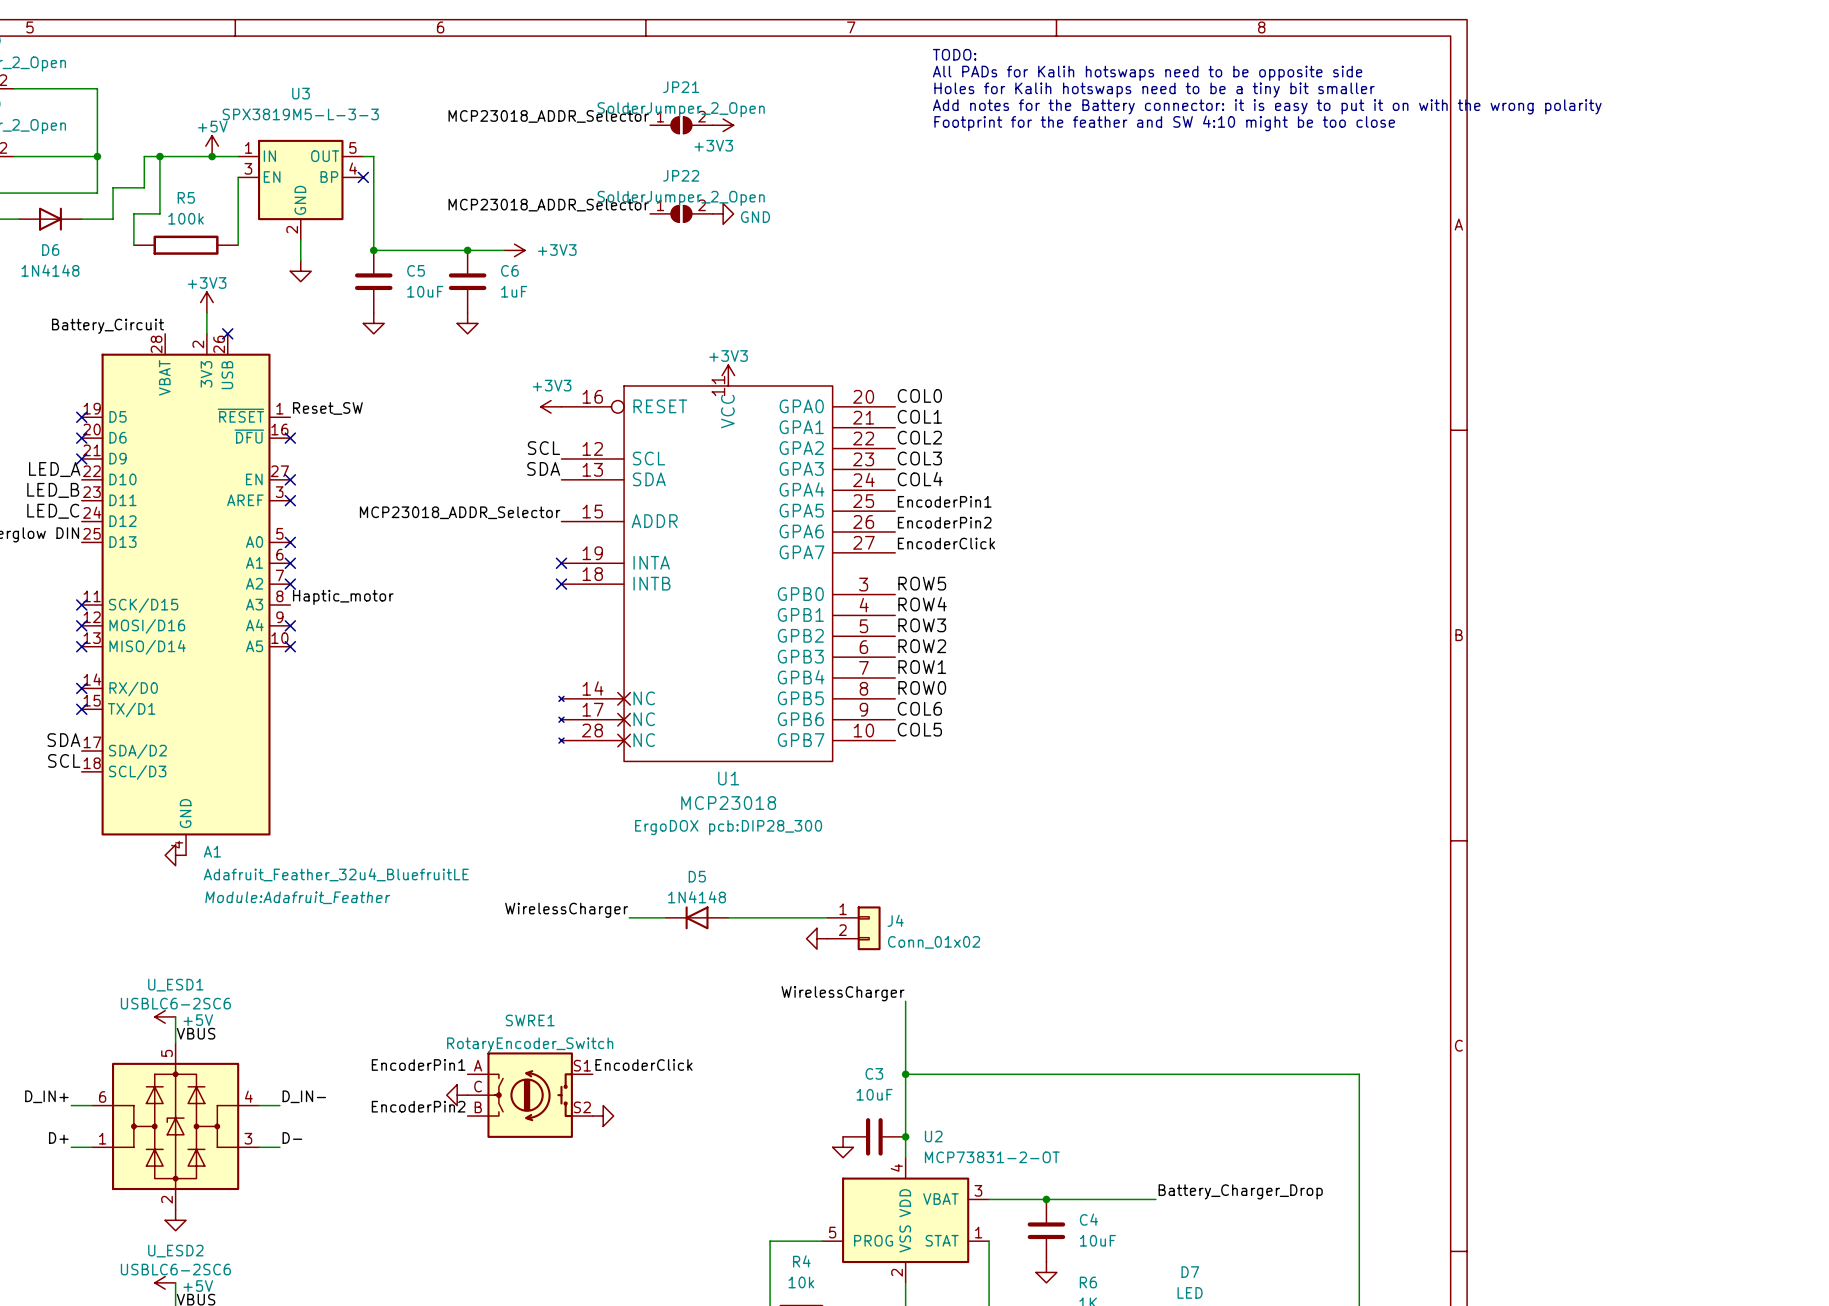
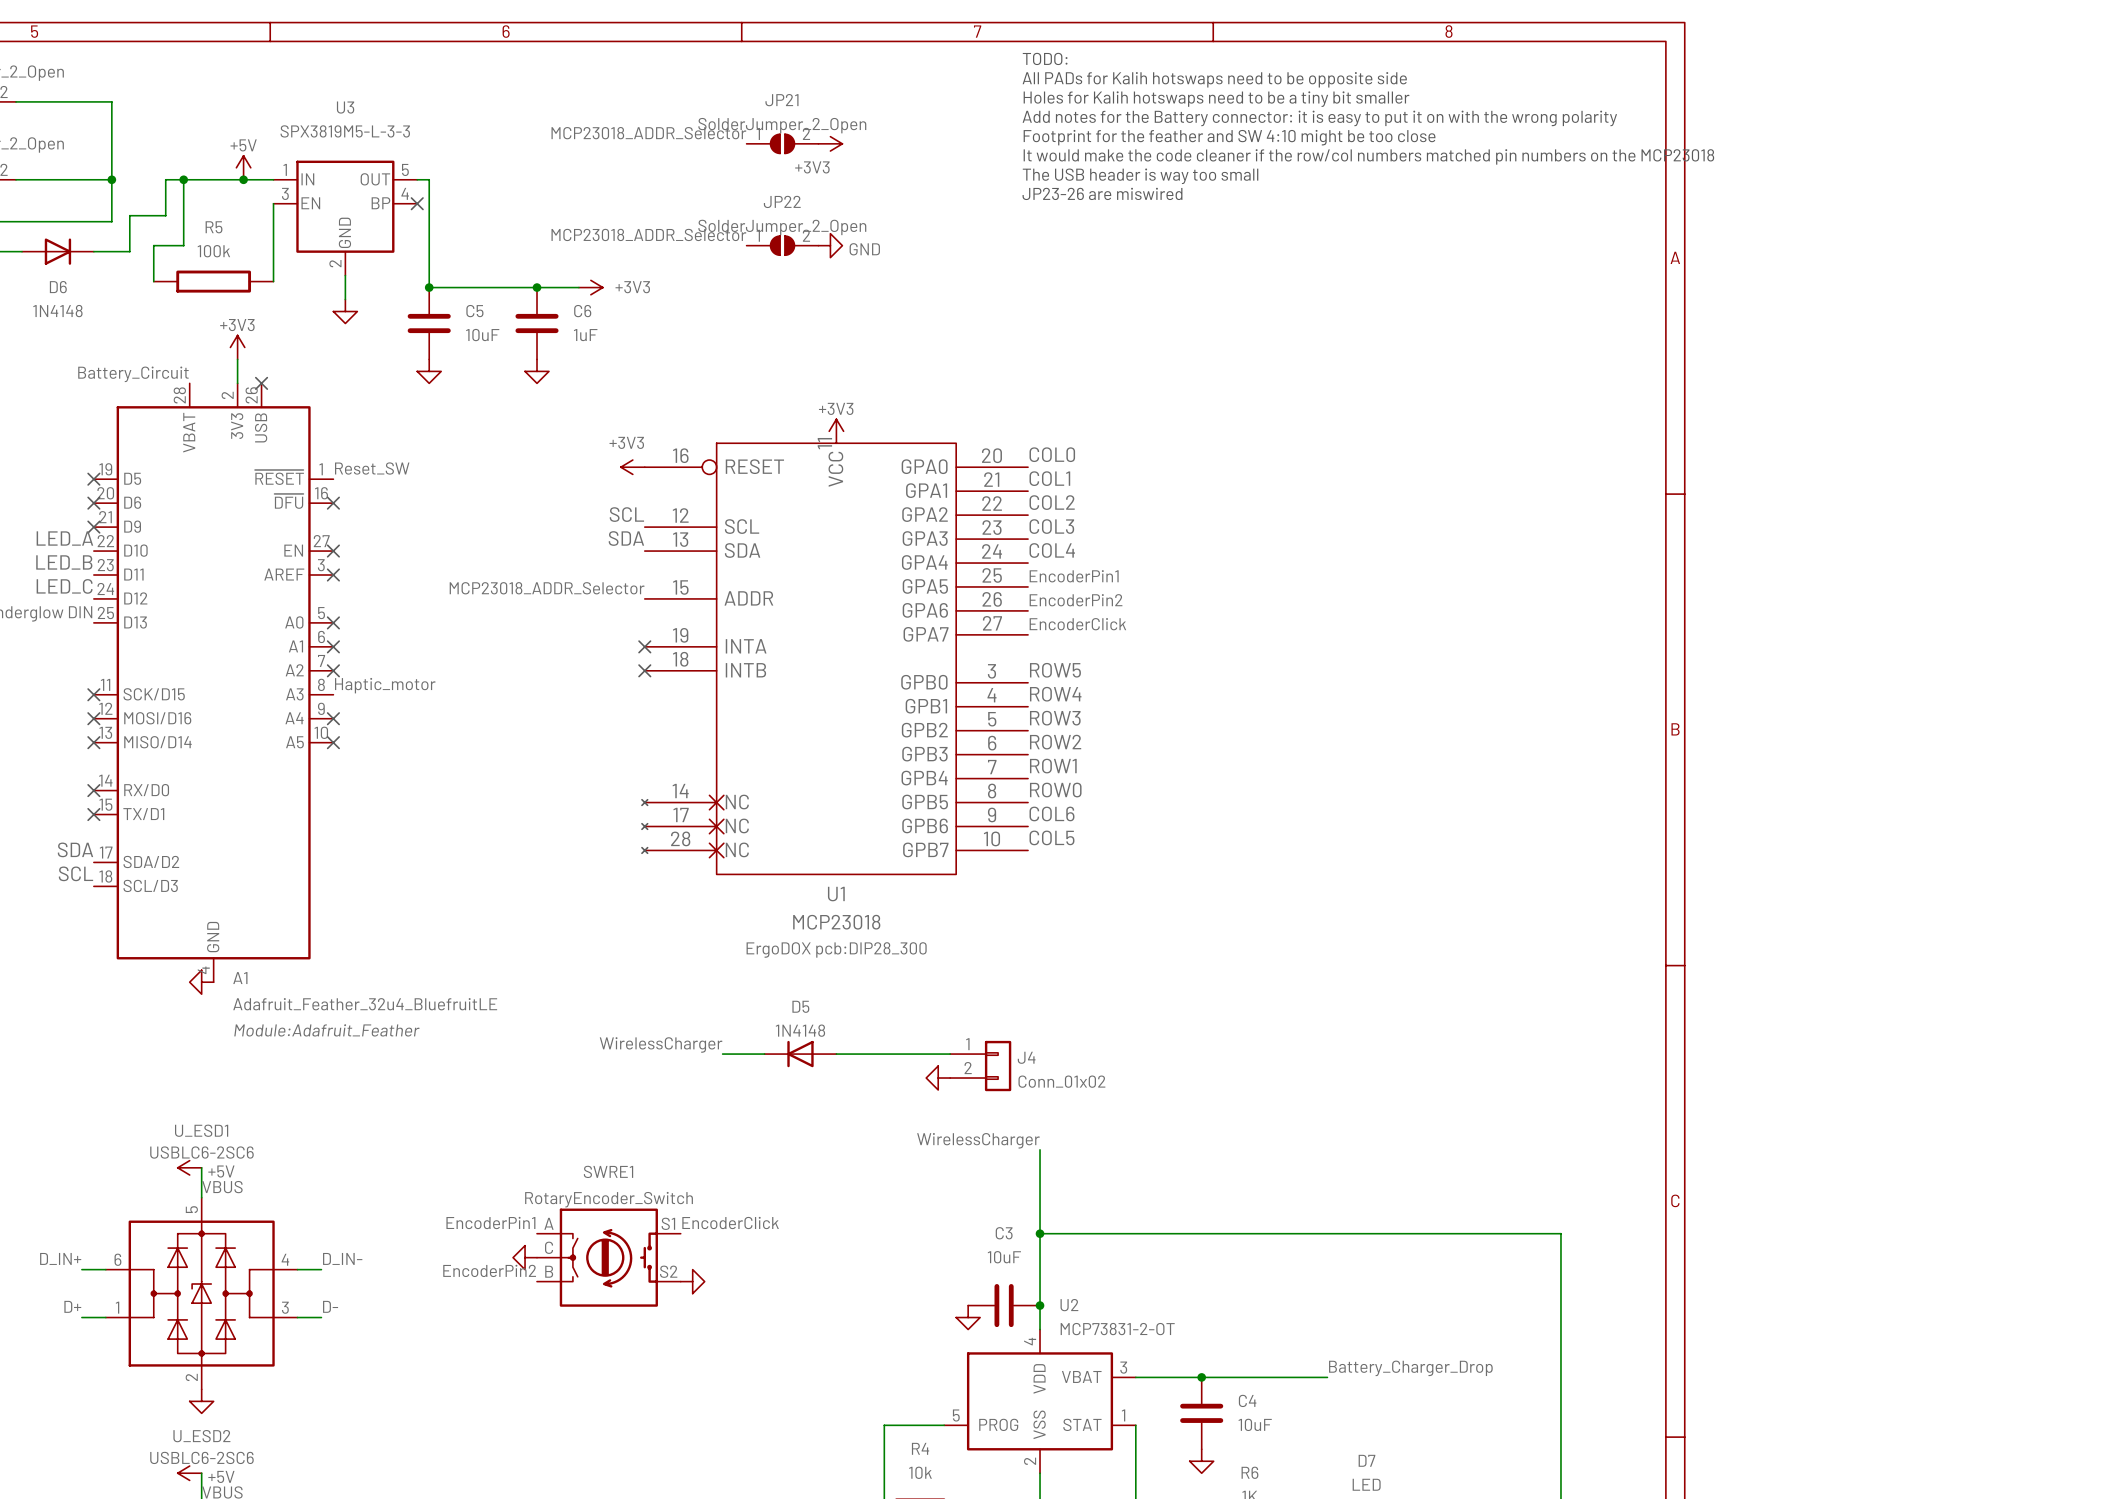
text position: TODO: (954, 54) -> TODO: (1045, 58)
text position: All PADs for Kalih hotswaps need to be opposite side (1147, 73) -> All PADs for Kalih hotswaps need to be opposite side (1214, 79)
text position: Holes for Kalih hotswaps need to be a tiny bit smaller (1154, 90) -> Holes for Kalih hotswaps need to be a tiny bit smaller (1216, 99)
text position: Add notes for the Battery connector: it is easy to put it on with the wrong polarity (1267, 106) -> Add notes for the Battery connector: it is easy to put it on with the wrong polarity (1319, 118)
text position: Footprint for the feather and SW 4:10 might be too close (1164, 123) -> Footprint for the feather and SW 4:10 might be too close (1229, 137)
text: none -> It would make the code cleaner if the row/col numbers matched pin numbers on the MCP23018 (1368, 156)
text: none -> The USB header is way too small (1140, 176)
text: none -> JP23-26 are miswired (1102, 193)

